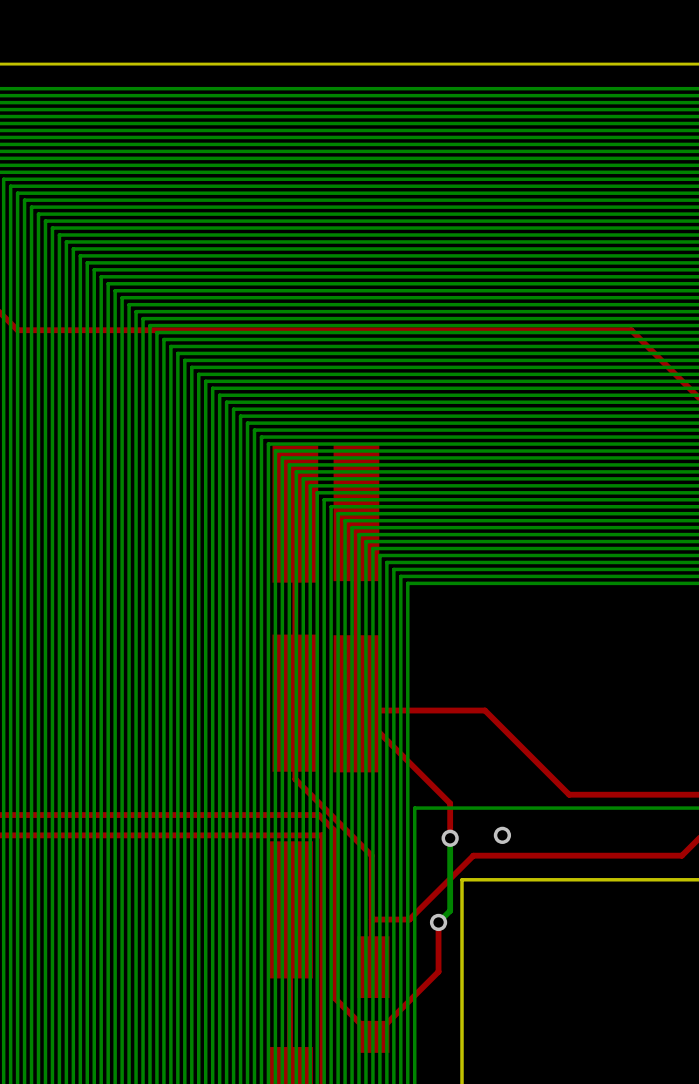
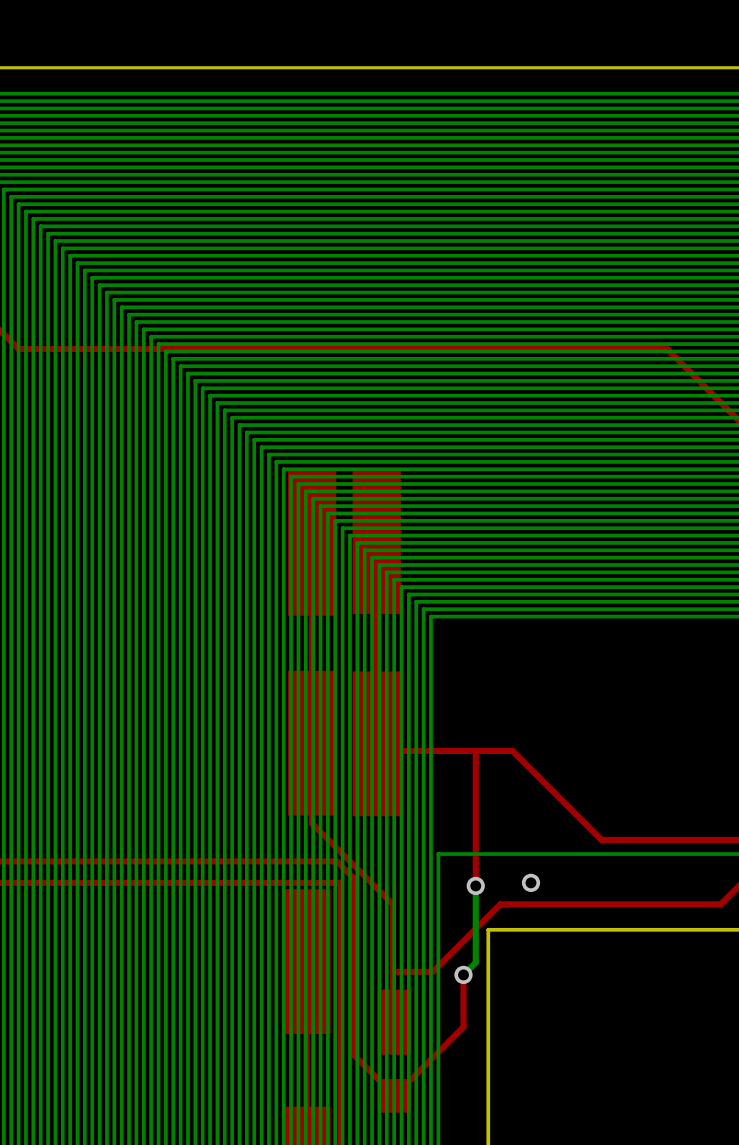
top track: (357, 710) (450, 803) -> (475, 750) (475, 849)

